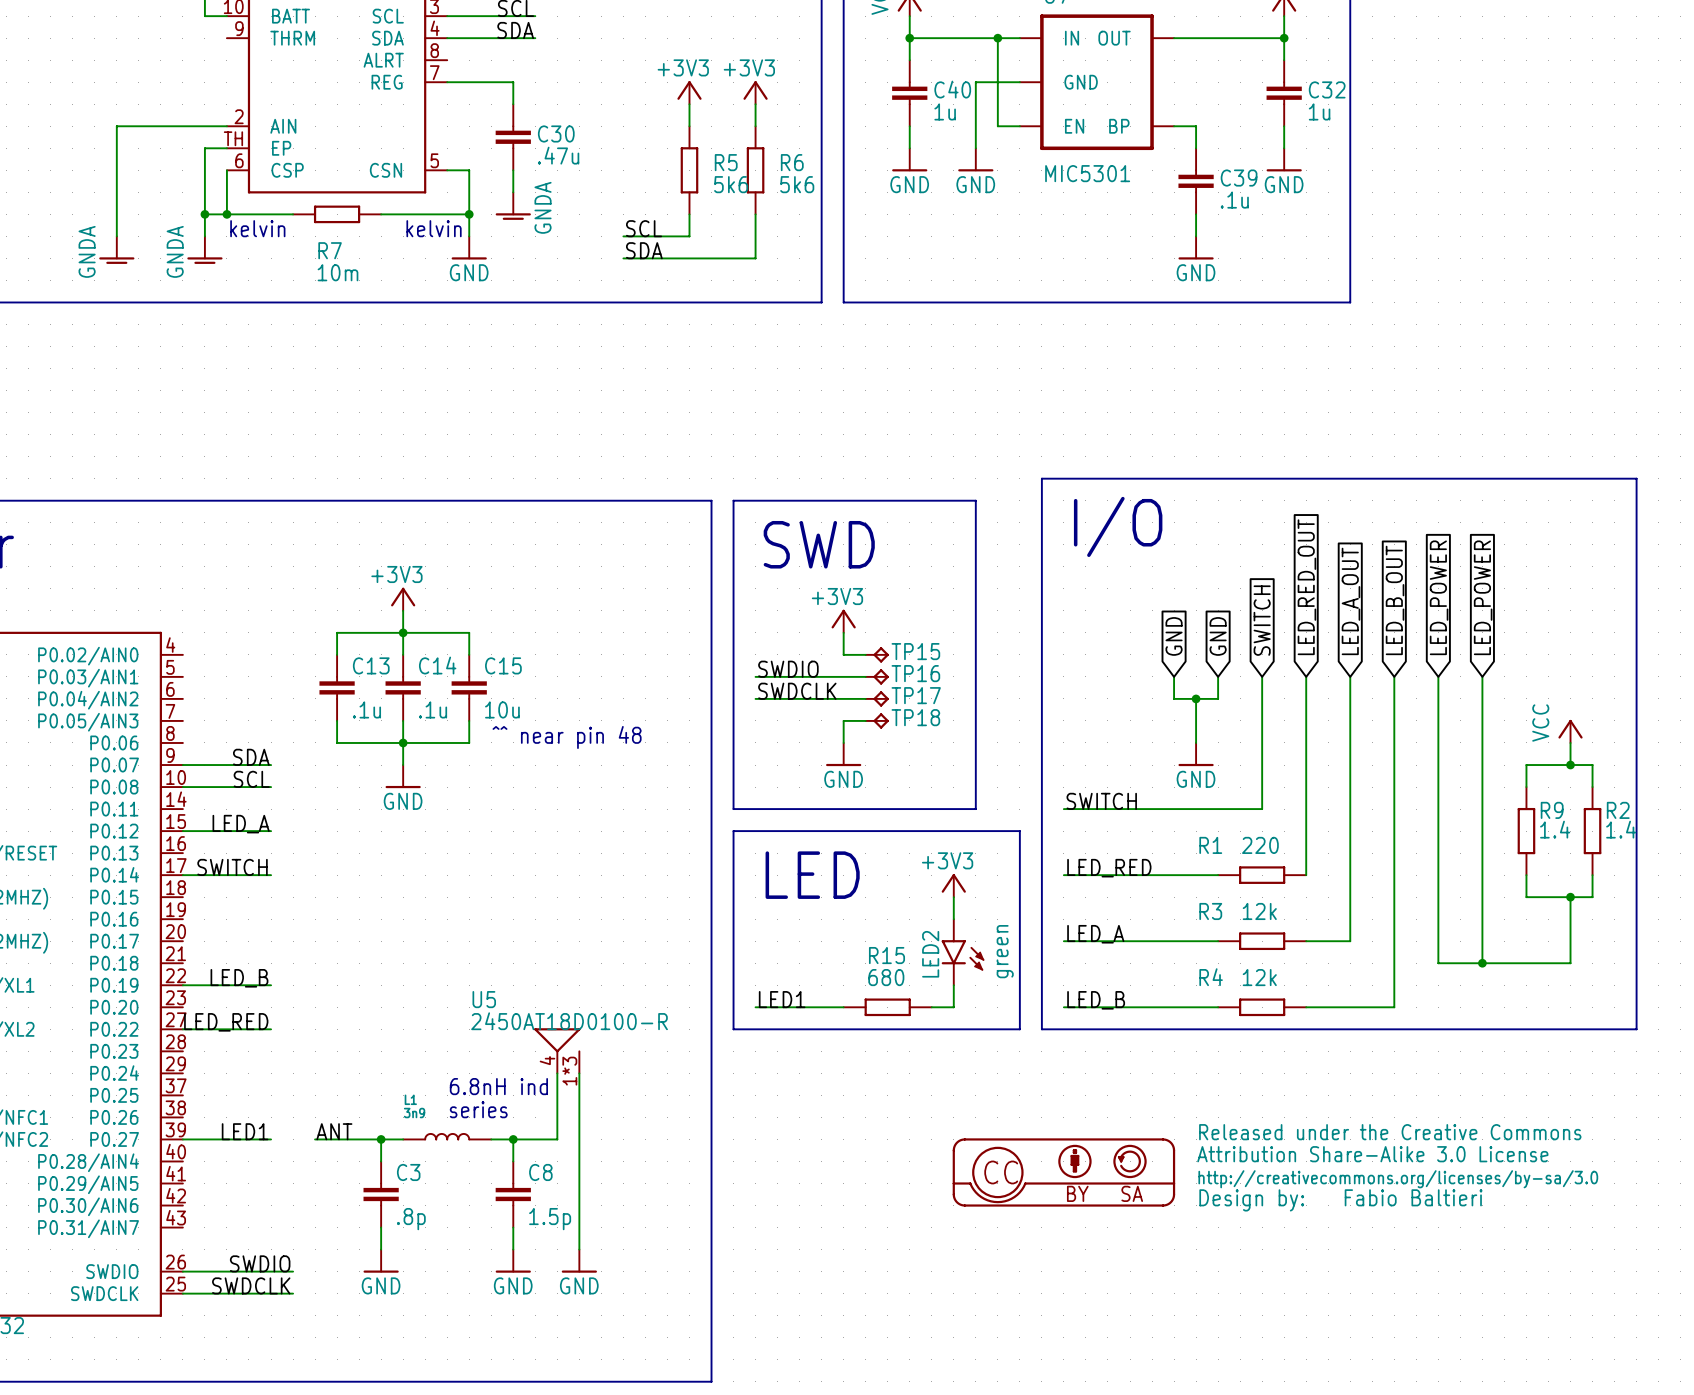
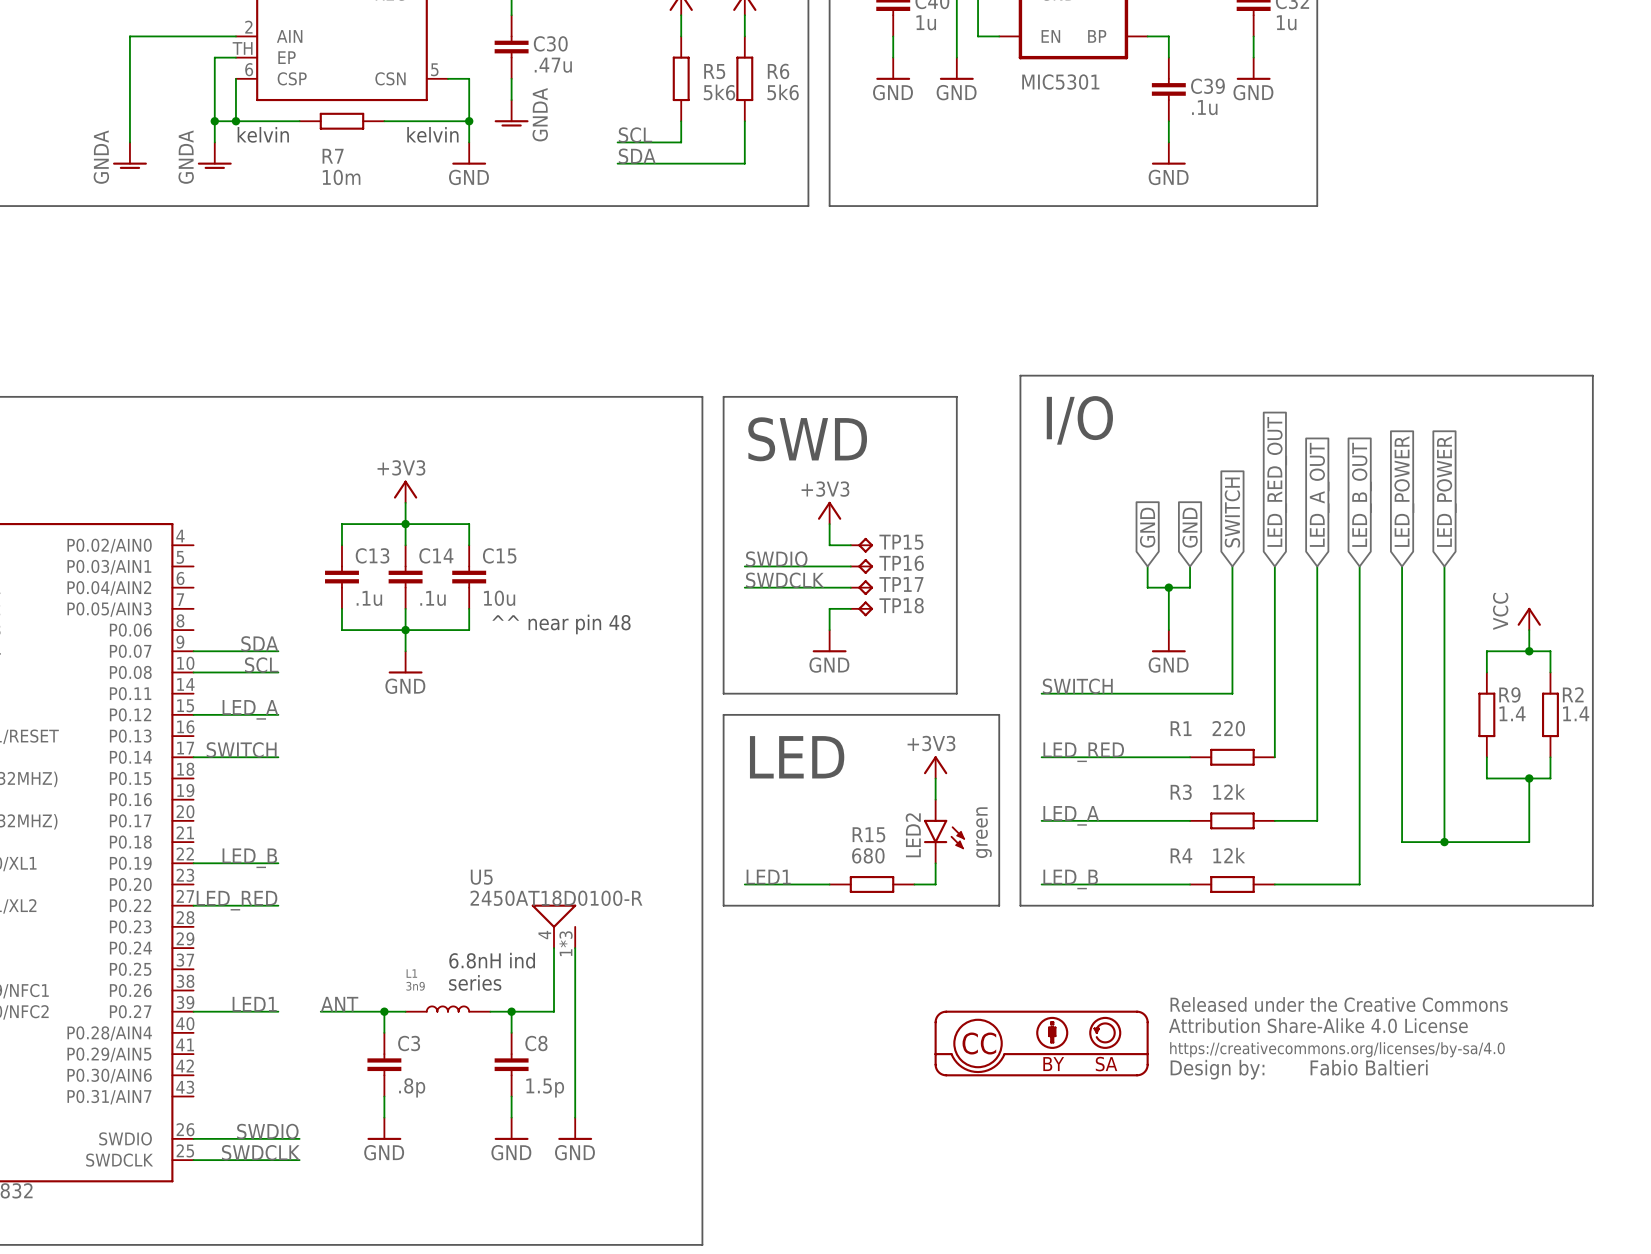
part text: Attribution Share-Alike 3.0 License (1372, 1154) -> Attribution Share-Alike 4.0 License (1318, 1025)
part text: http://creativecommons.org/licenses/by-sa/3.0 (1398, 1179) -> https://creativecommons.org/licenses/by-sa/4.0 (1337, 1049)

